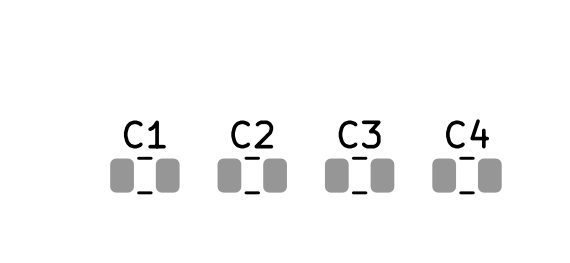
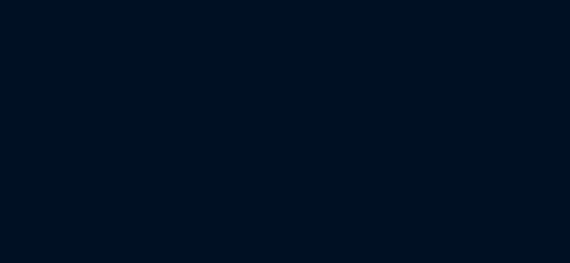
C1: (144, 175) -> none
C2: (252, 175) -> none
C3: (359, 175) -> none
C4: (467, 175) -> none

